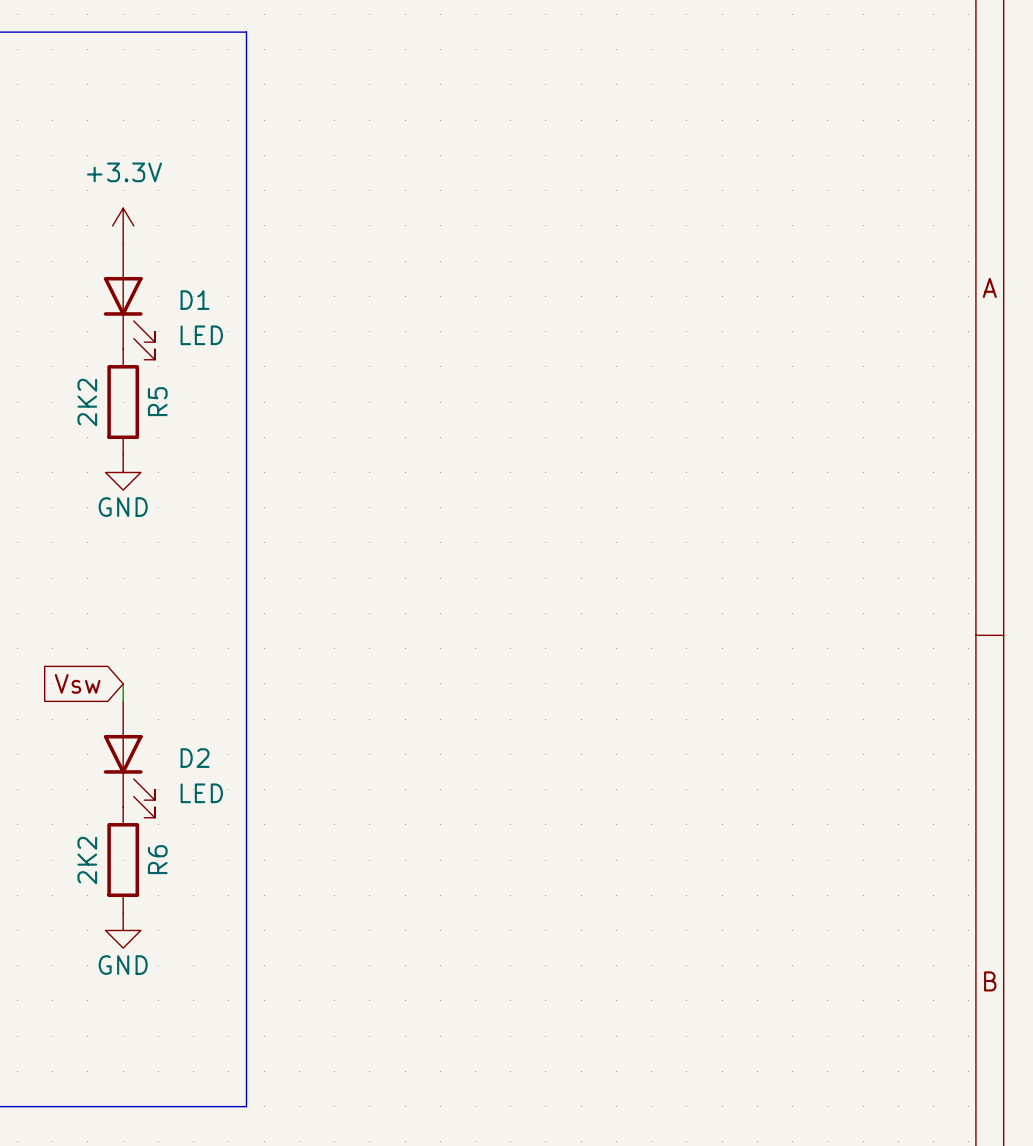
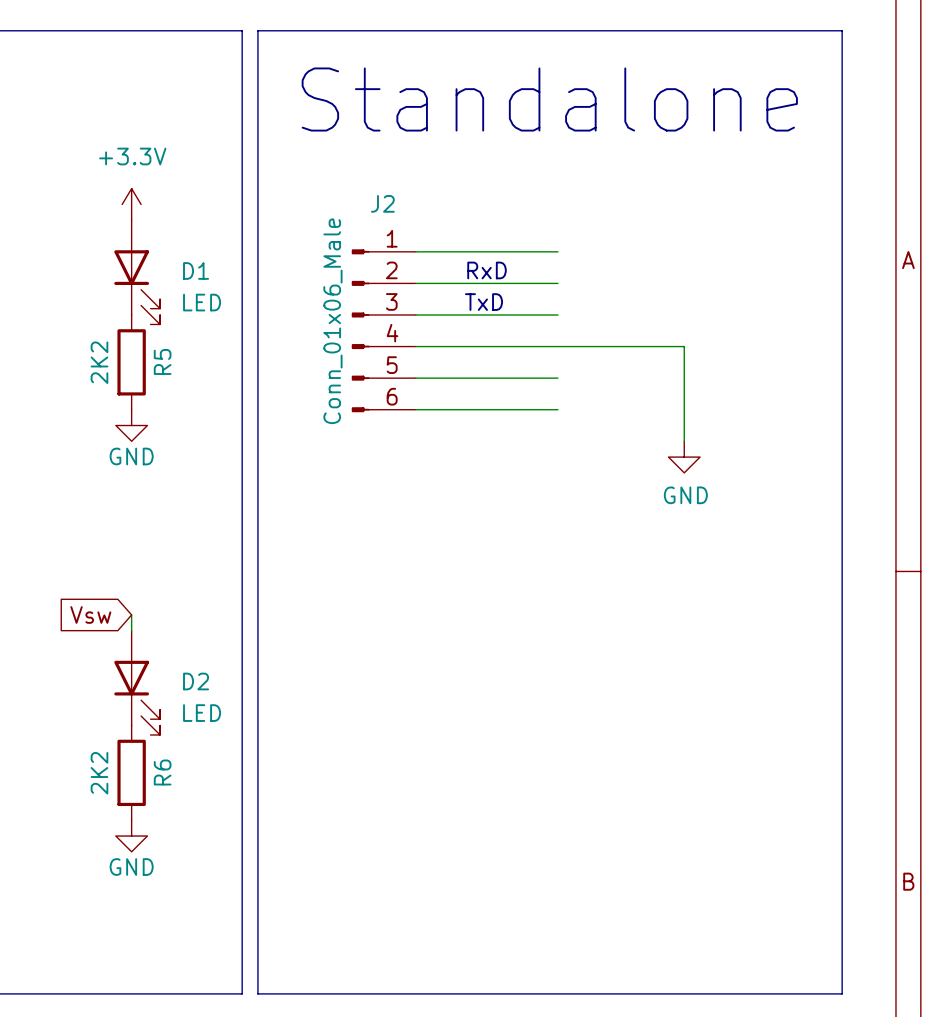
line: none -> (257, 30) (257, 993) (842, 993) (842, 30) (257, 30)
text: none -> Standalone (549, 99)
wire: none -> (415, 251) (557, 251)
text: none -> RxD (487, 270)
wire: none -> (415, 283) (557, 283)
text: none -> TxD (484, 302)
wire: none -> (415, 314) (557, 314)
J2: none -> Conn_01x06_Male (383, 330)
wire: none -> (415, 346) (684, 346) (684, 441)
wire: none -> (415, 378) (557, 378)
wire: none -> (415, 409) (557, 409)
power symbol: none -> GND (684, 457)

